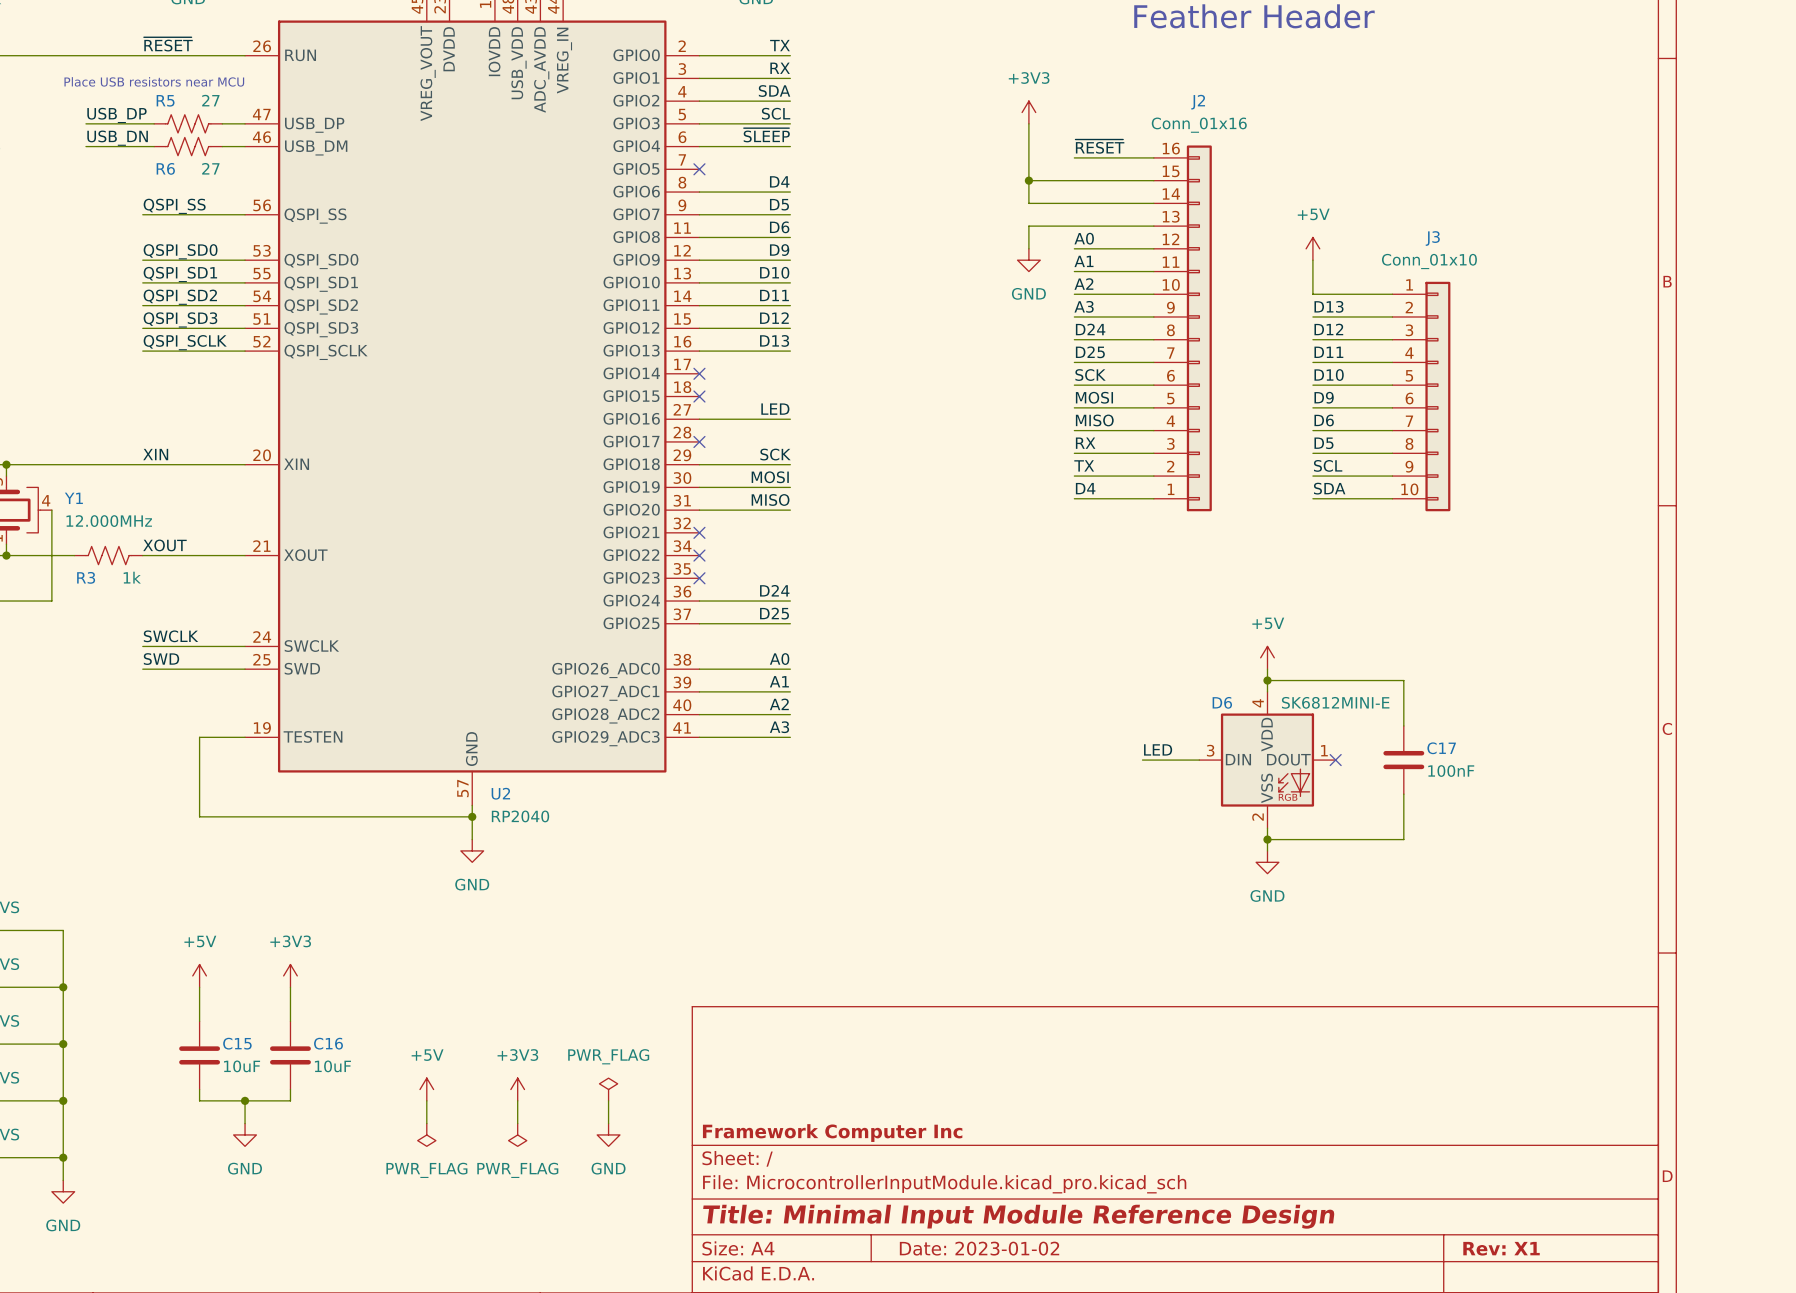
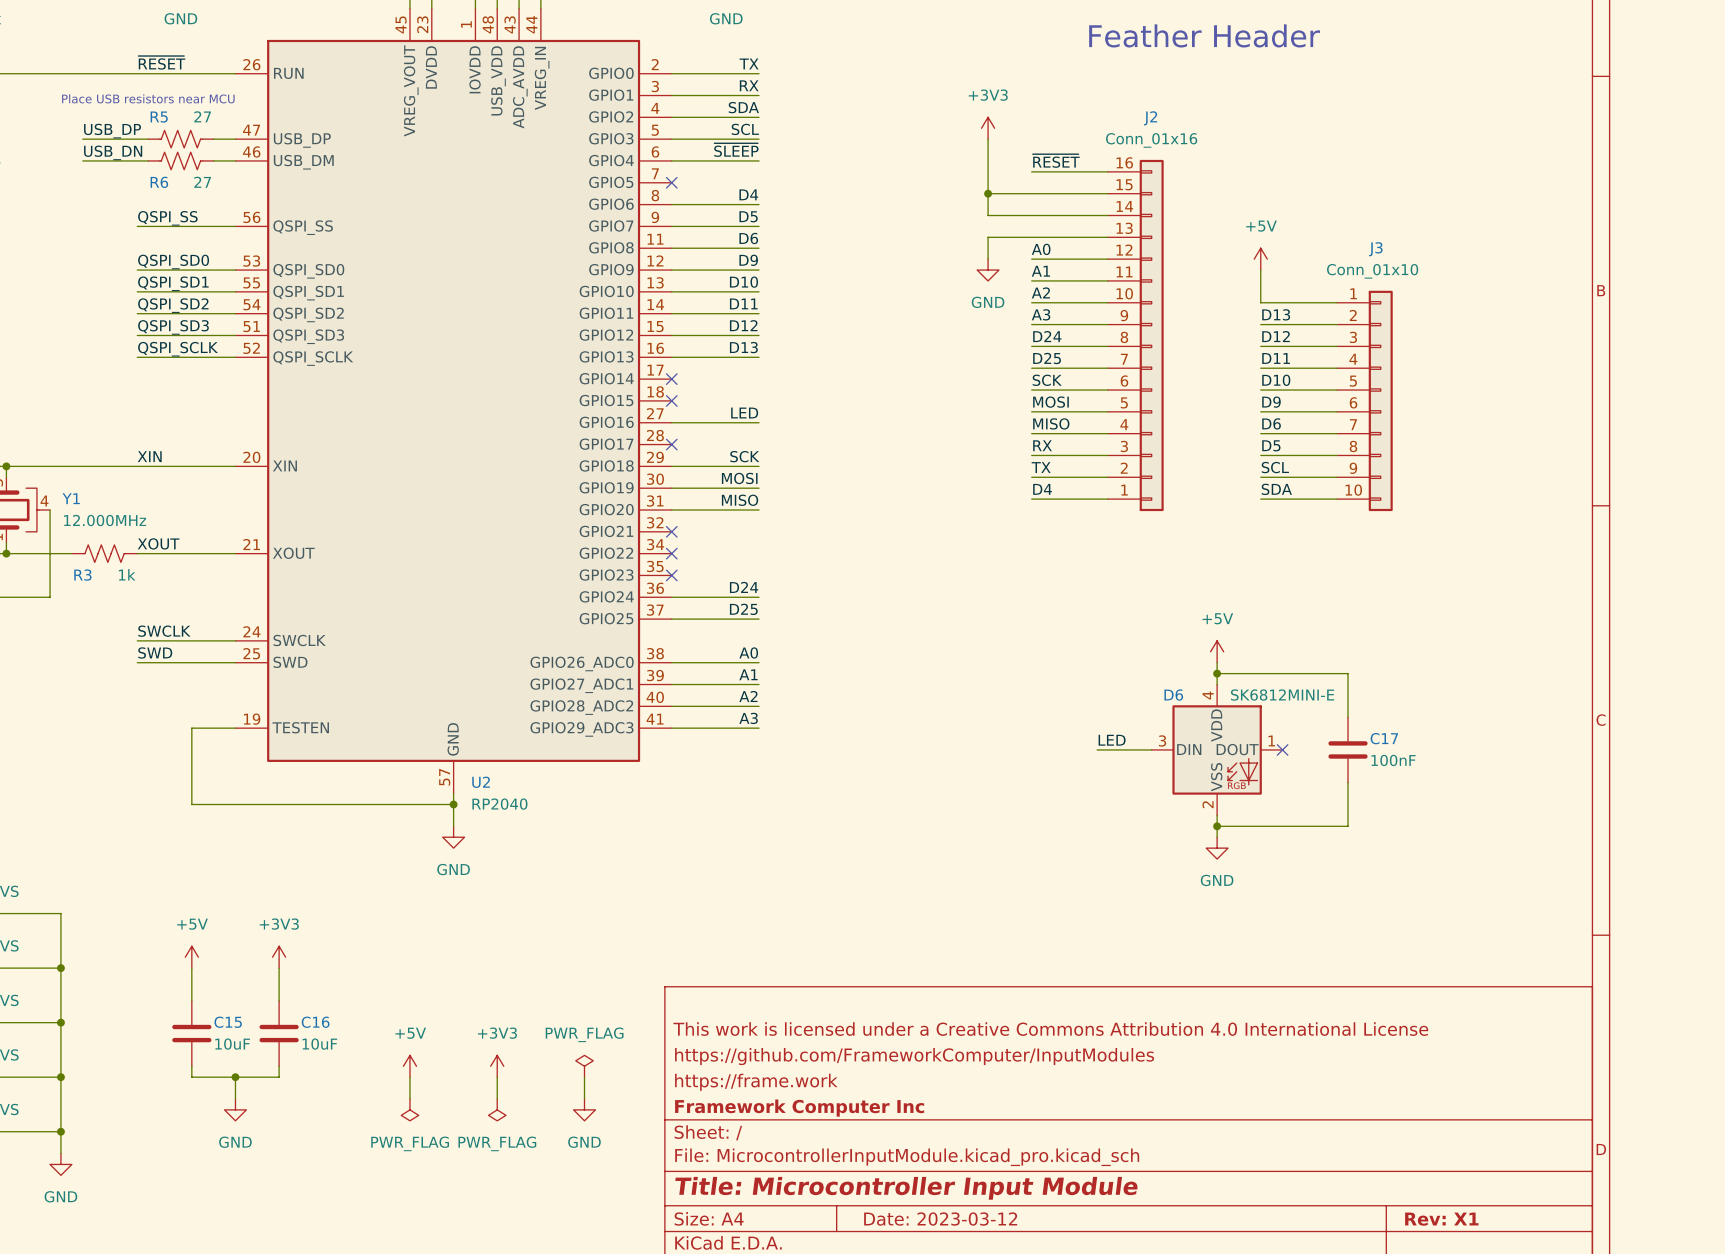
title block: none -> This work is licensed under a Creative Commons Attribution 4.0 International License (1050, 1029)
title block: none -> https://github.com/FrameworkComputer/InputModules (914, 1056)
title block: none -> https://frame.work (756, 1082)
title block: Title: Minimal Input Module Reference Design (1018, 1216) -> Title: Microcontroller Input Module (906, 1188)
title block: Date: 2023-01-02 (979, 1248) -> Date: 2023-03-12 (940, 1219)

